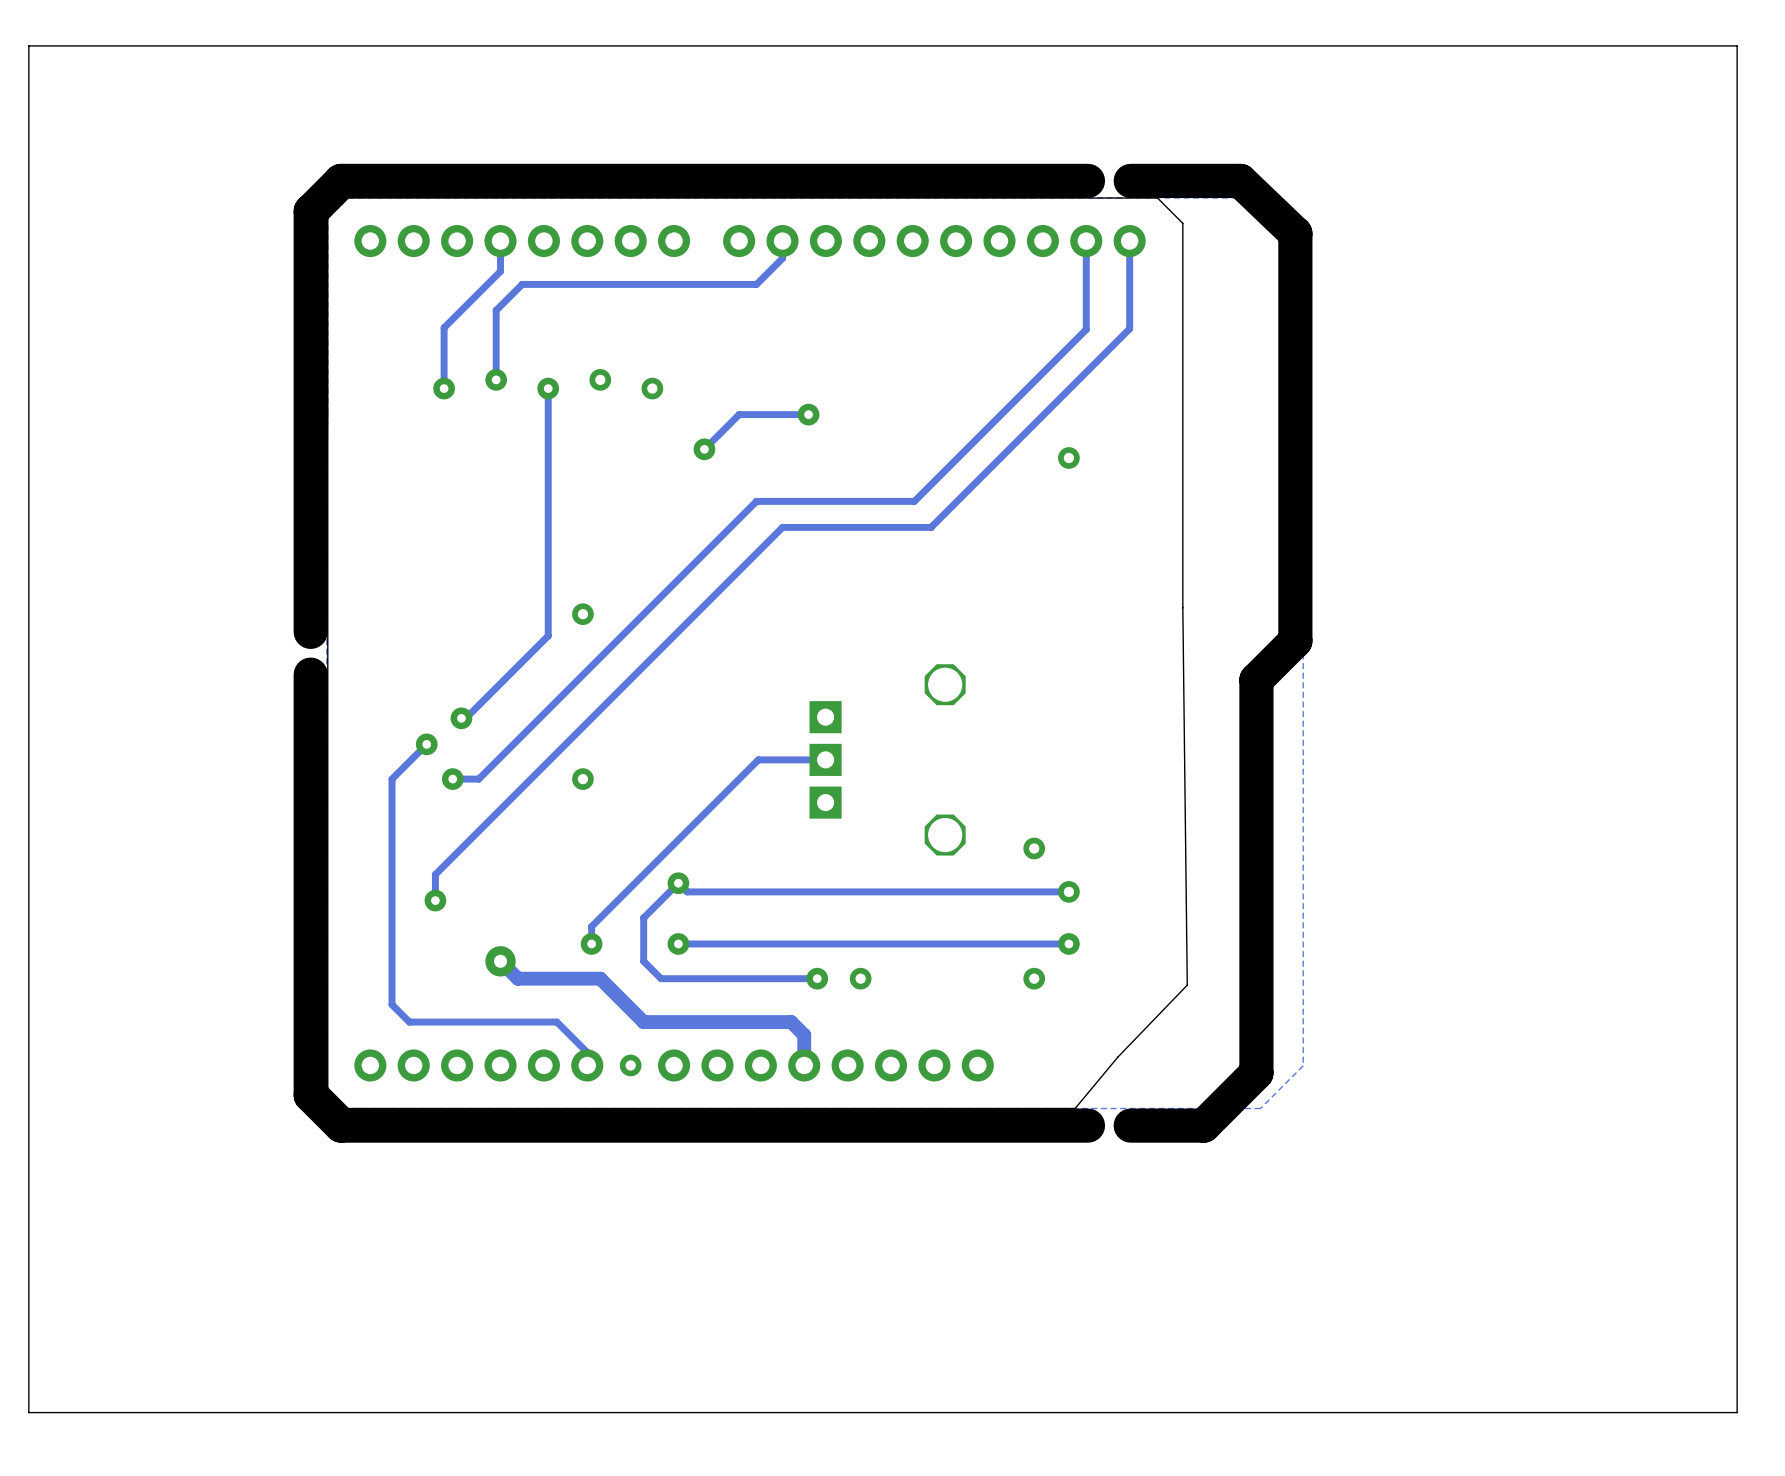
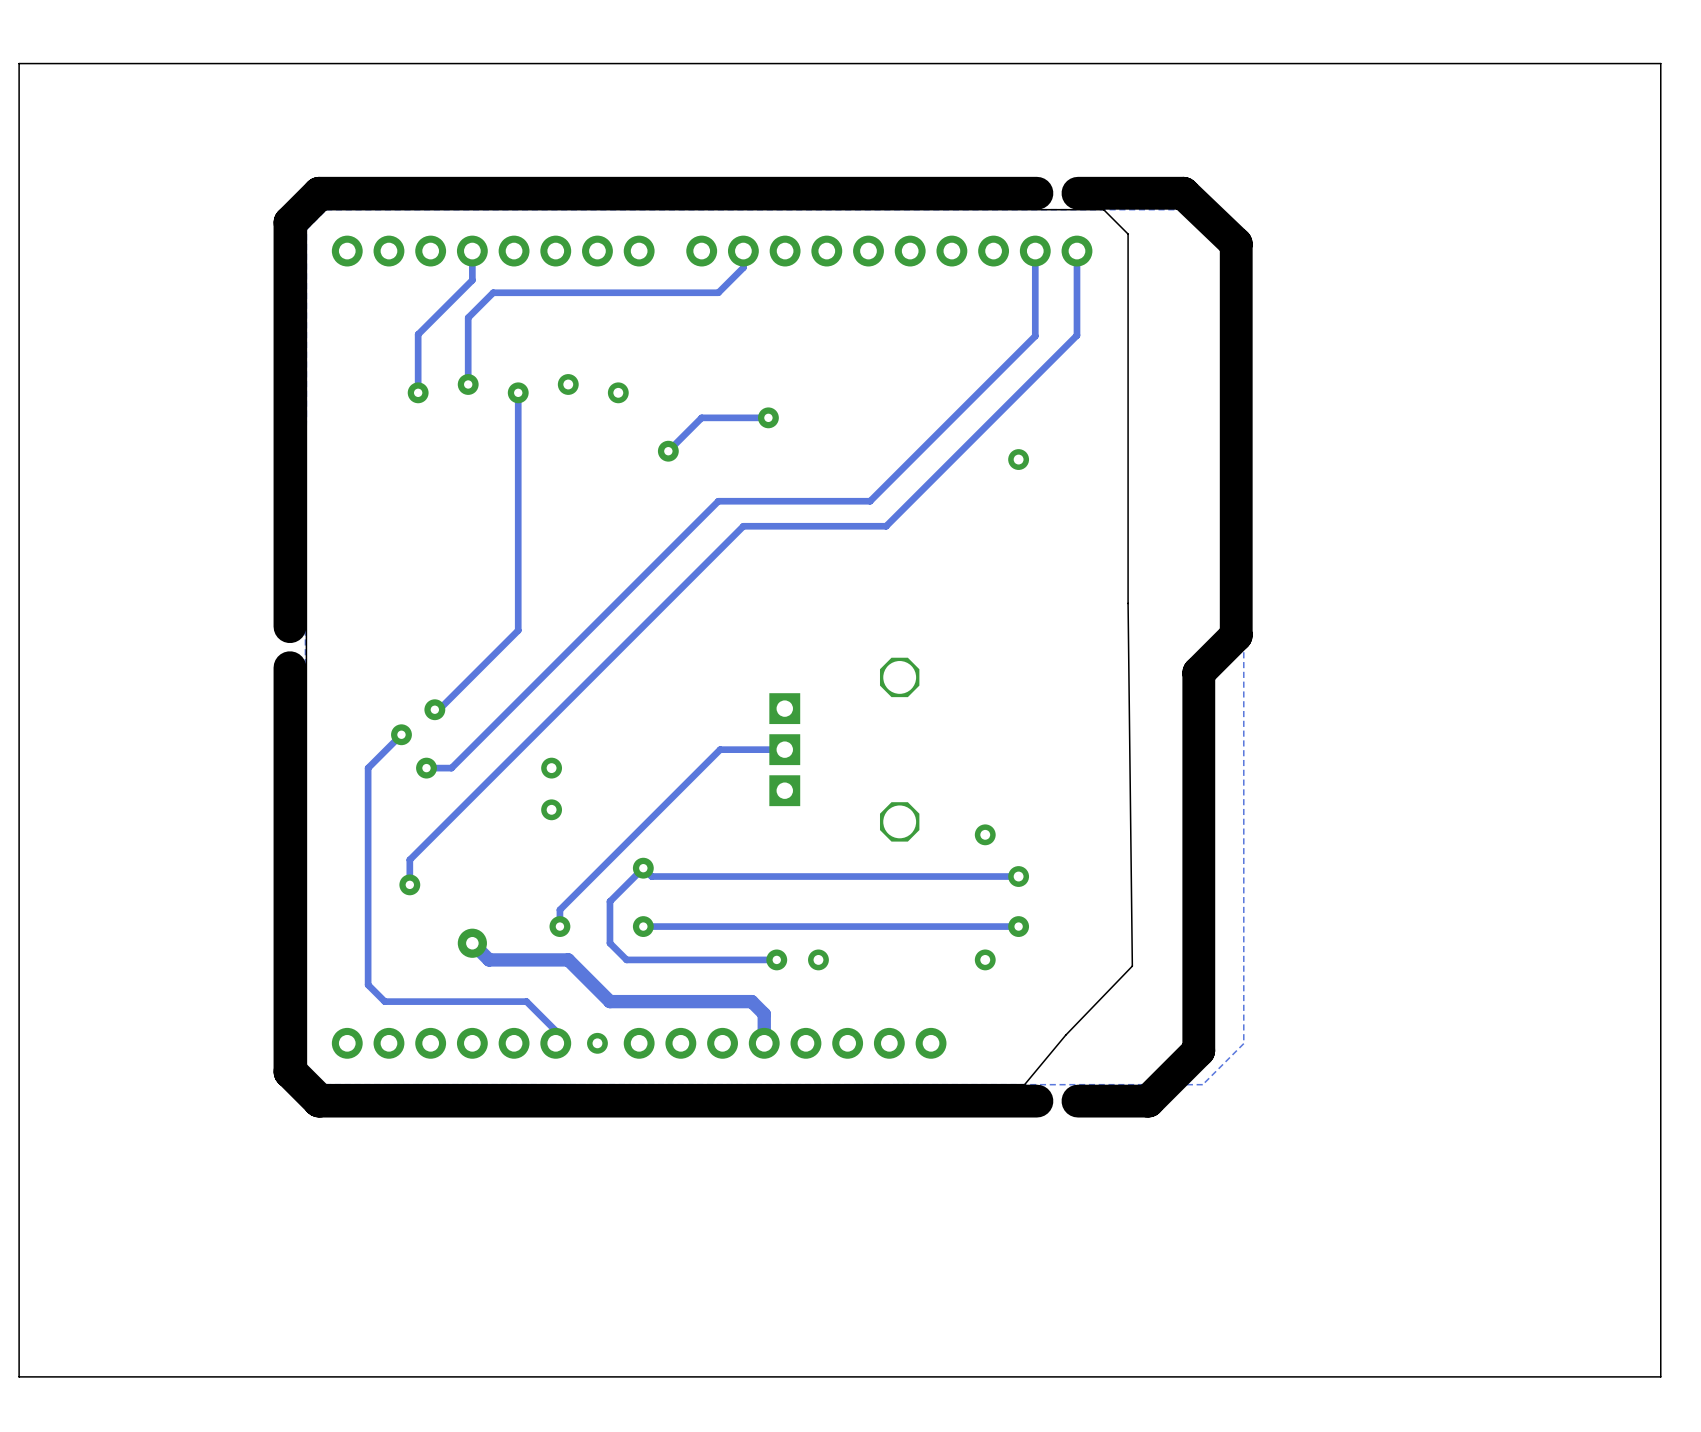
via: (582, 614) -> none
via: none -> (551, 809)

